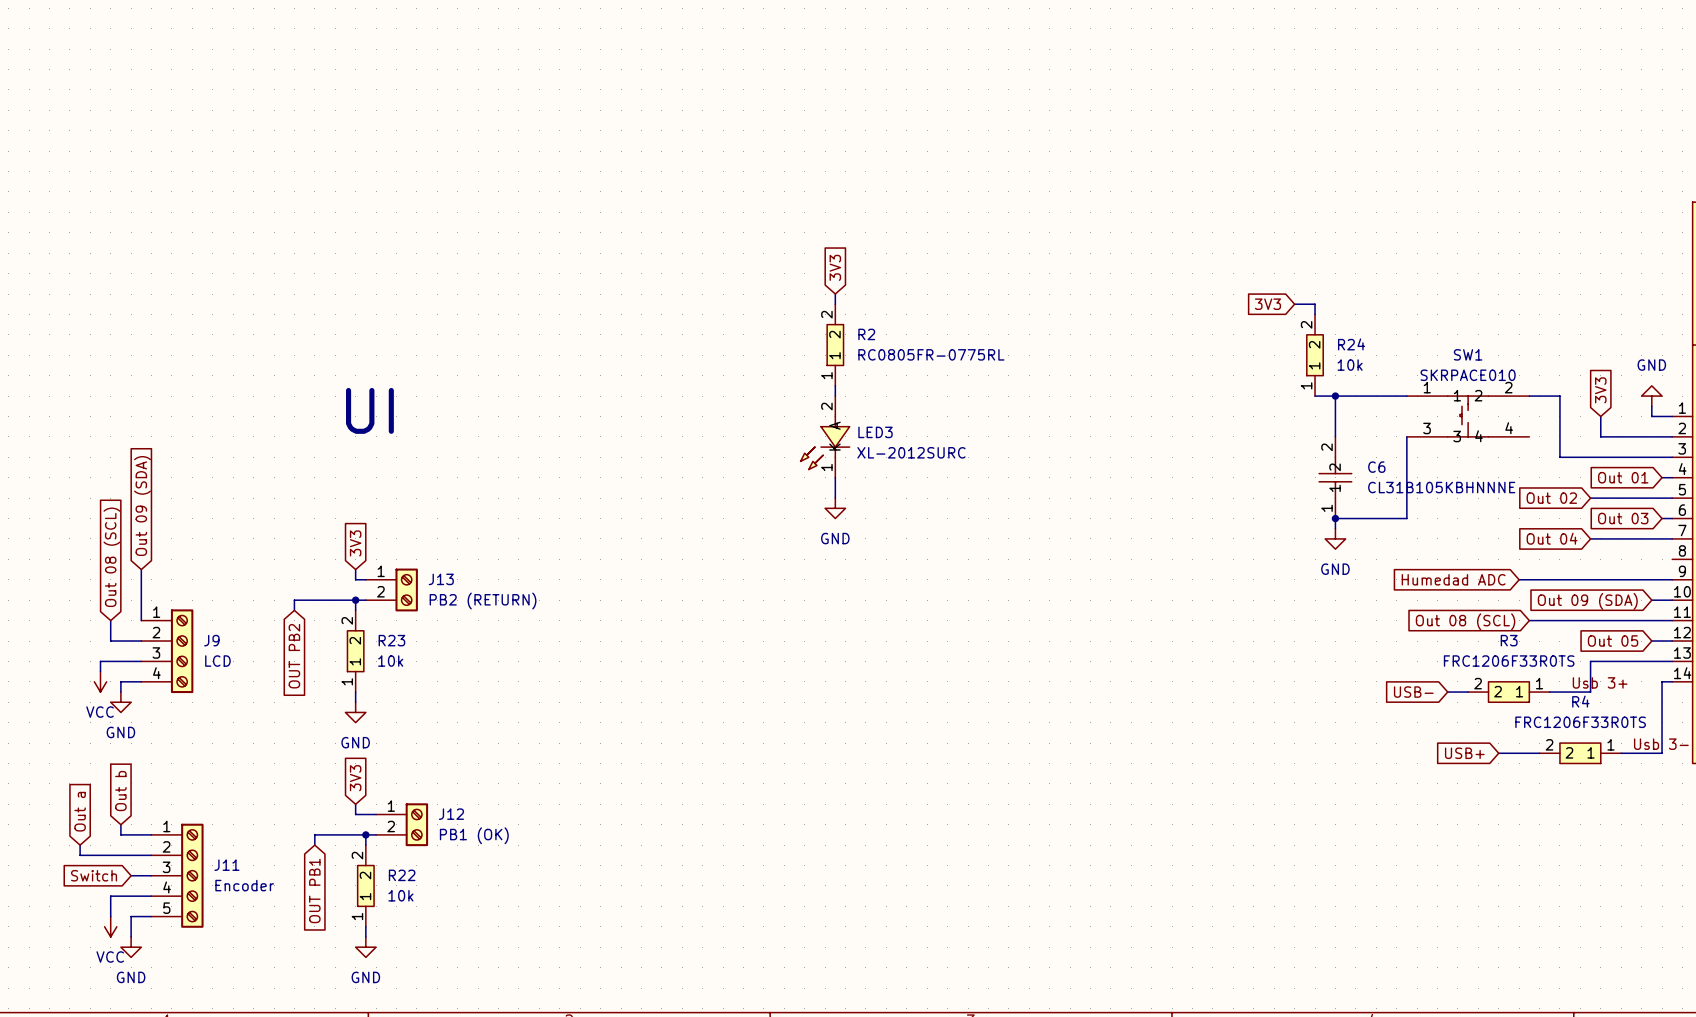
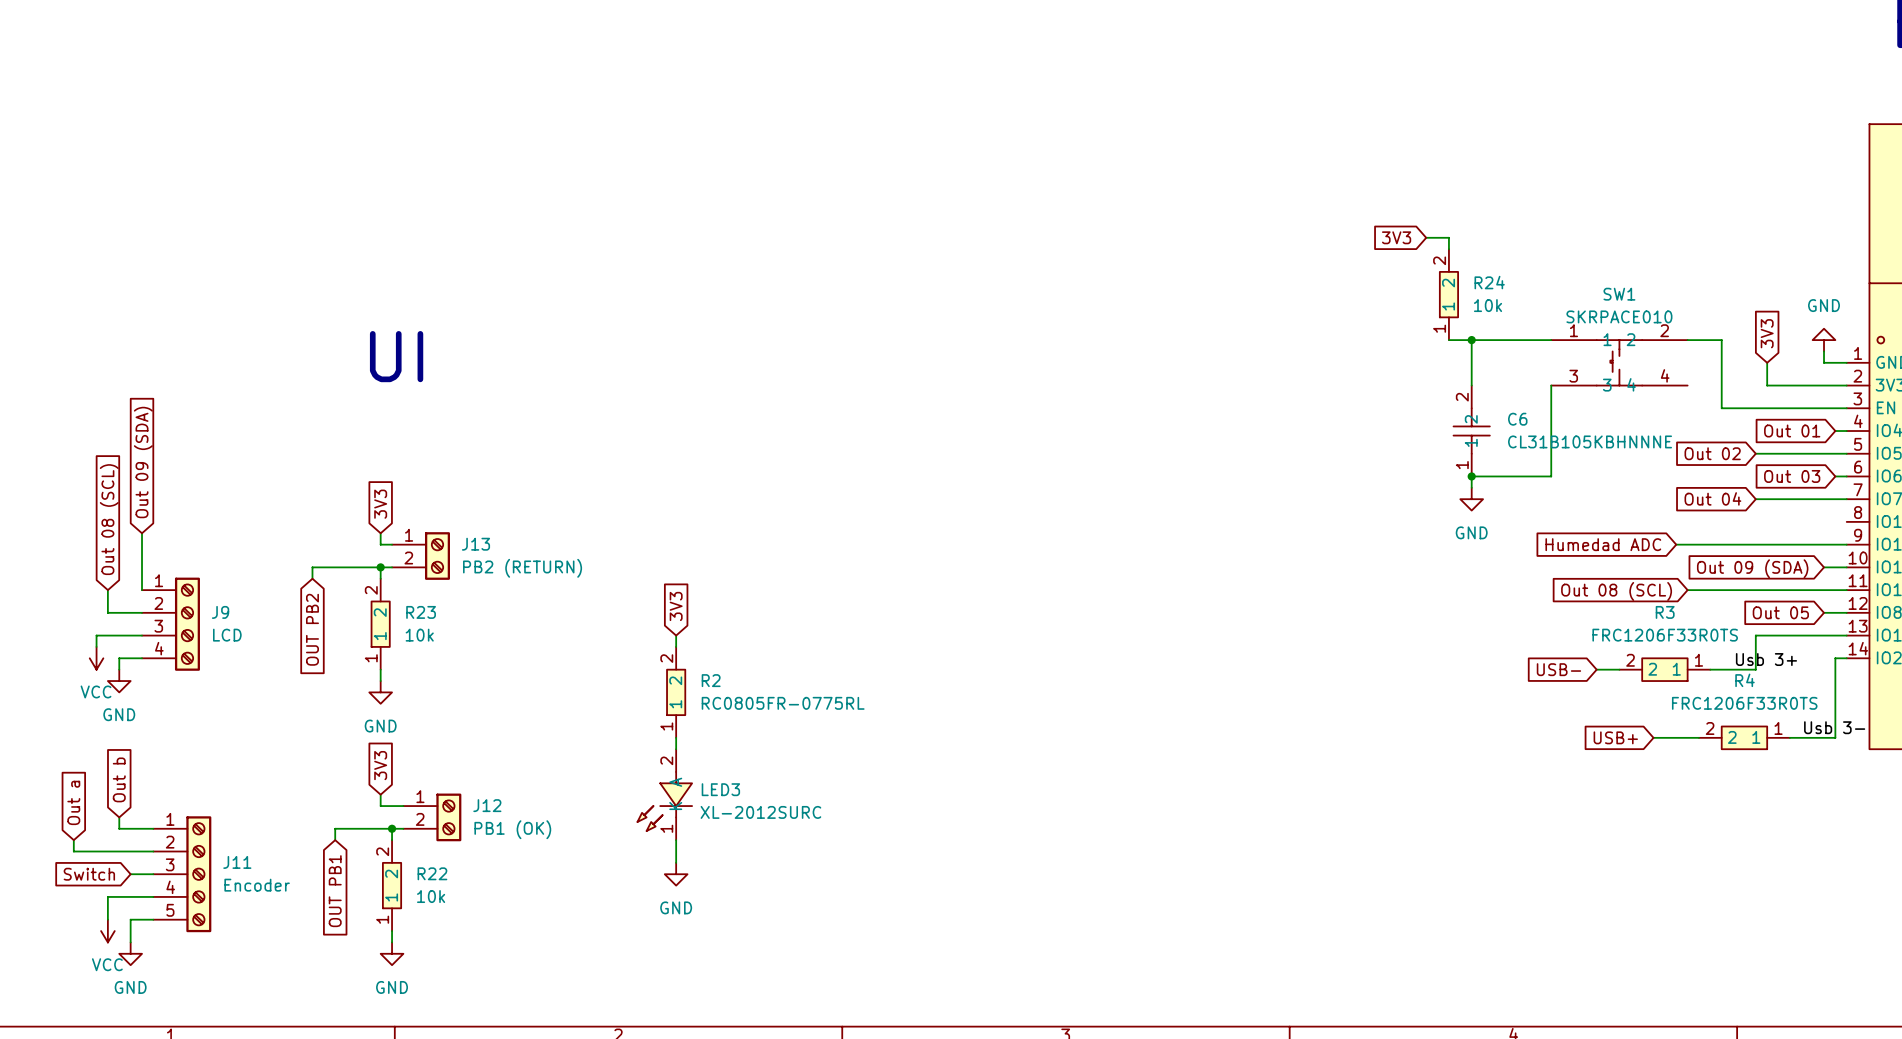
global label: 3V3 (835, 267) -> none
wire: (835, 294) (835, 304) -> none
R2 position: (835, 345) -> (676, 692)
wire: (835, 385) (835, 396) -> none
LED3 position: (825, 436) -> (664, 794)
wire: (835, 477) (835, 498) -> none
power symbol: GND (835, 508) -> none
global label: none -> 3V3 (676, 606)
wire: none -> (676, 635) (676, 646)
wire: none -> (676, 737) (676, 749)
wire: none -> (676, 840) (676, 862)
power symbol: none -> GND (676, 874)

